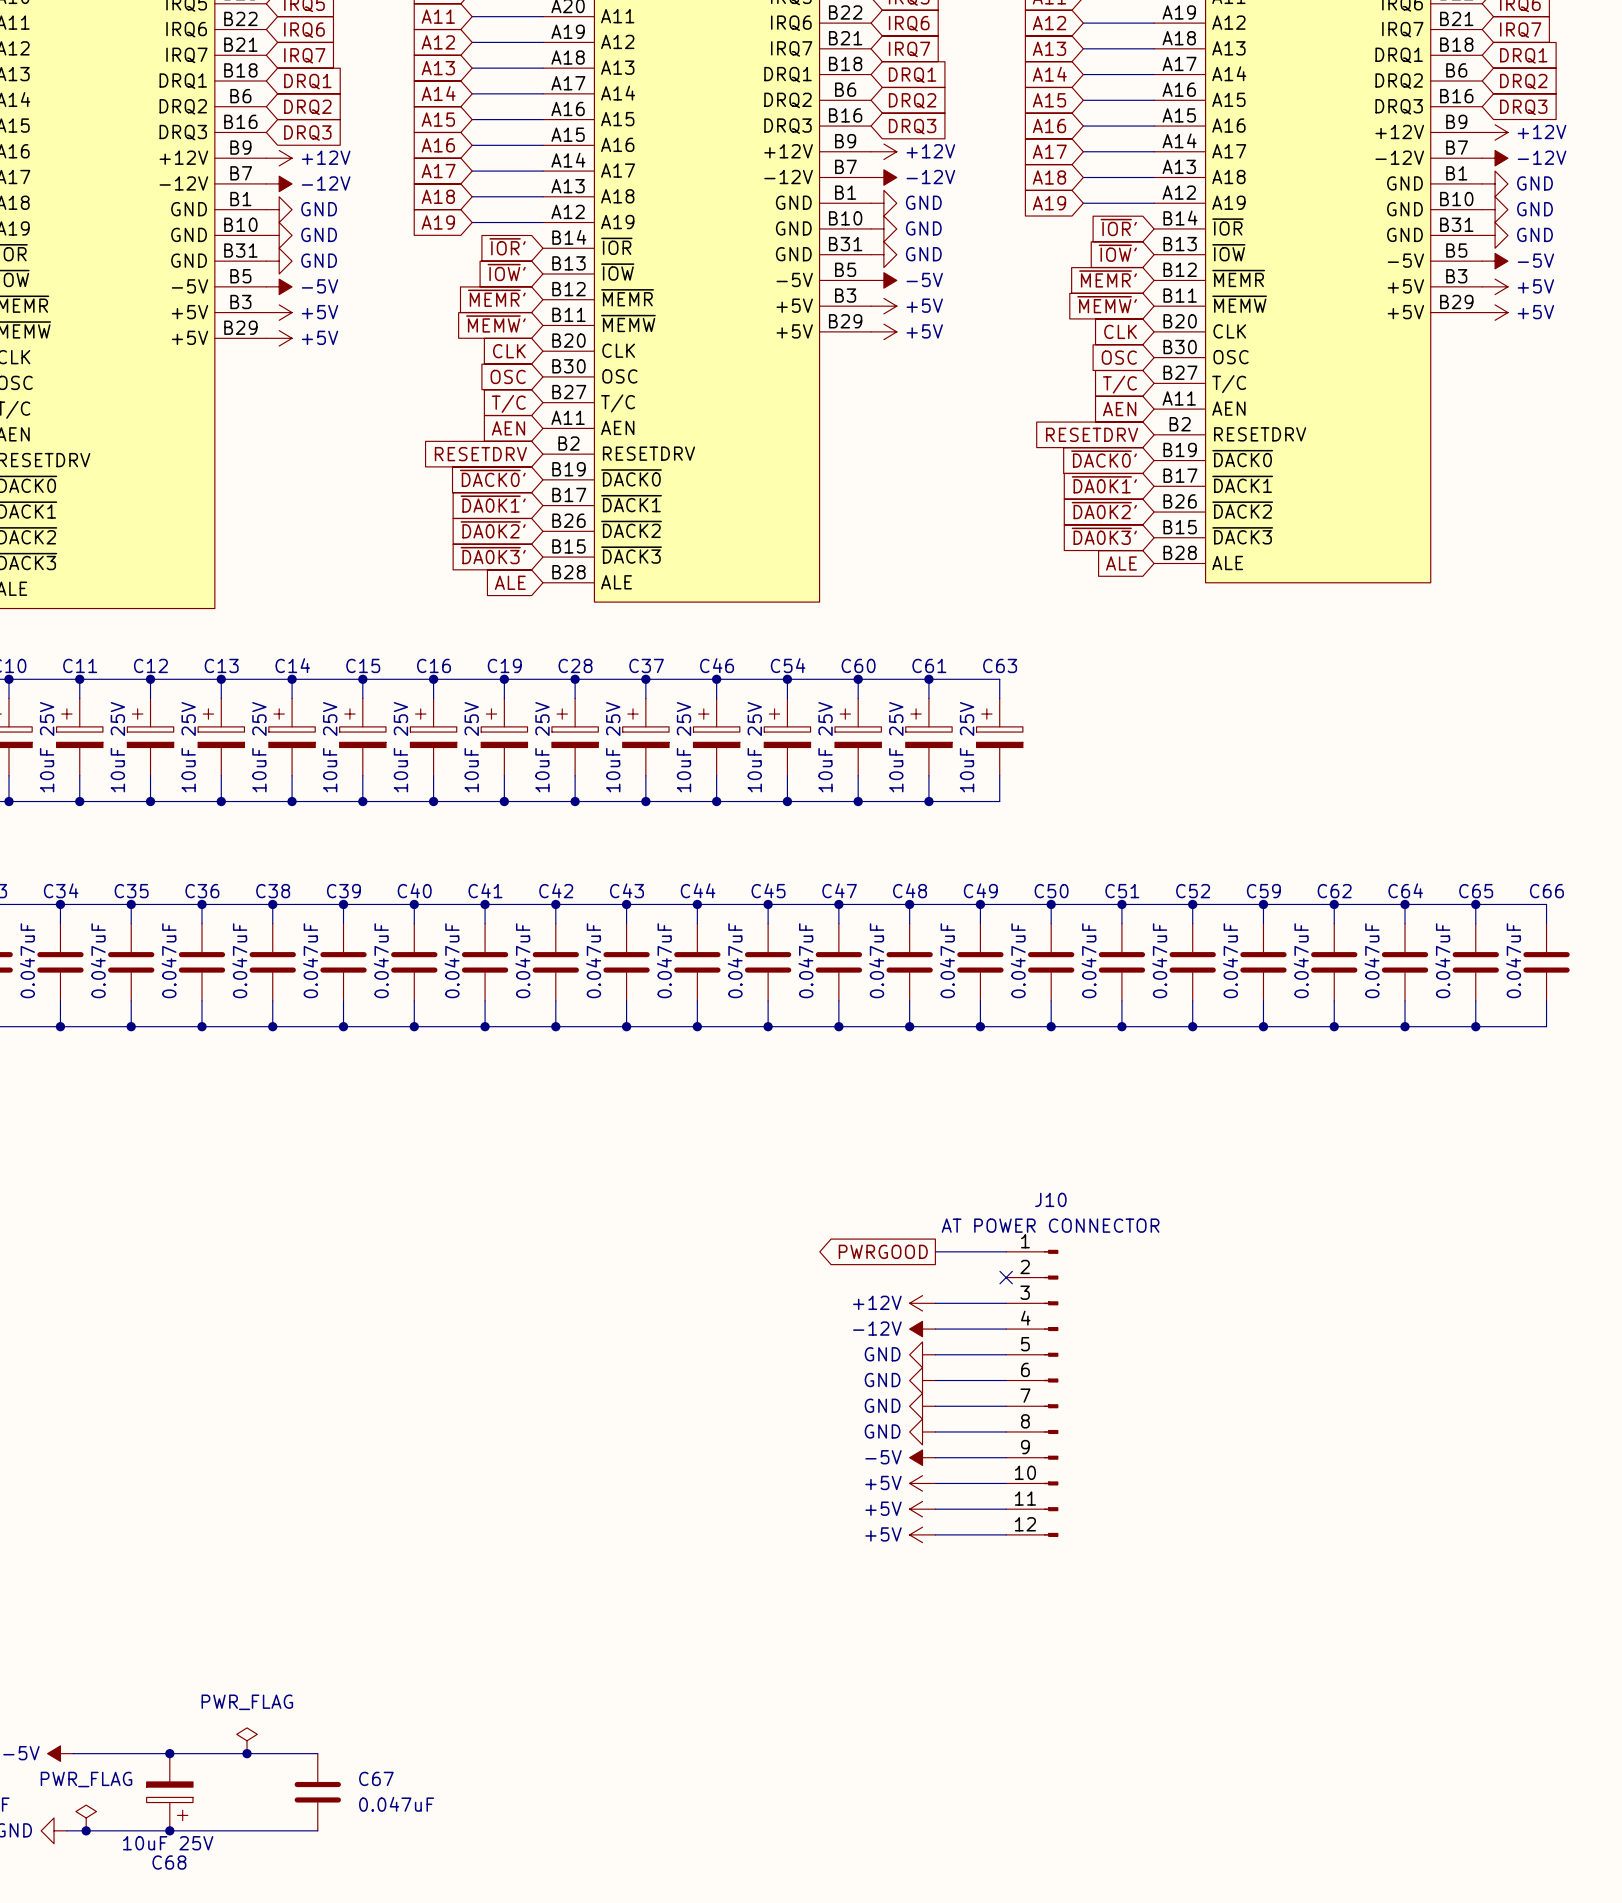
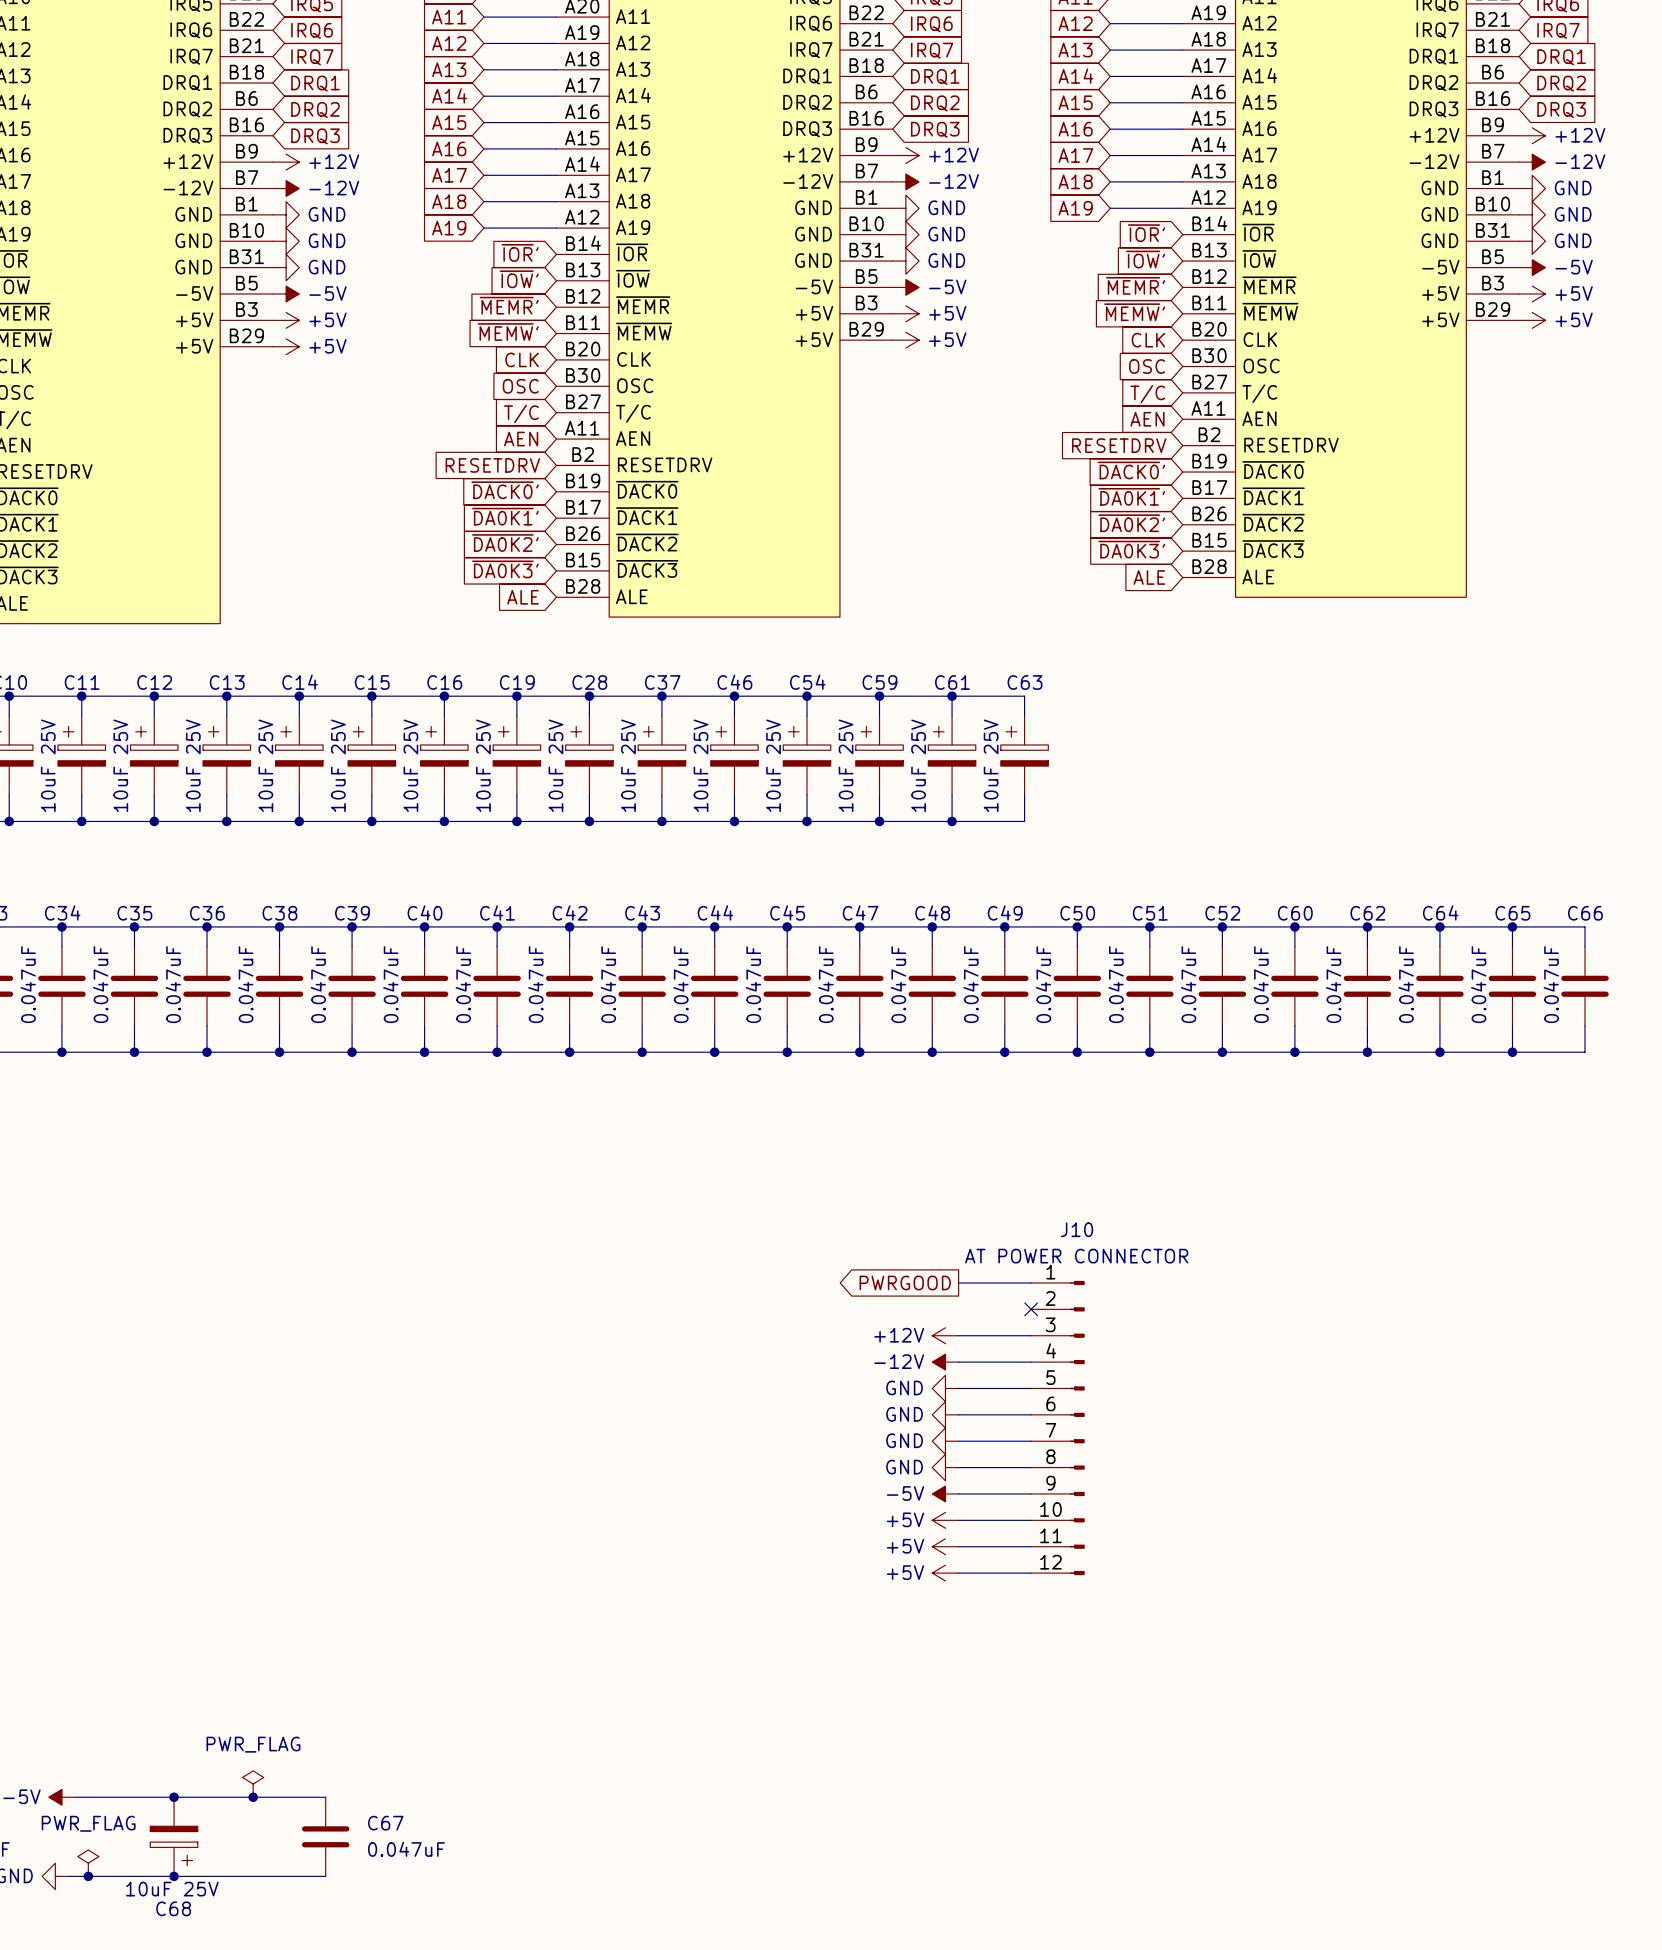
C60 name: C60 (858, 665) -> C59 (879, 682)
C59 name: C59 (1263, 891) -> C60 (1295, 913)

